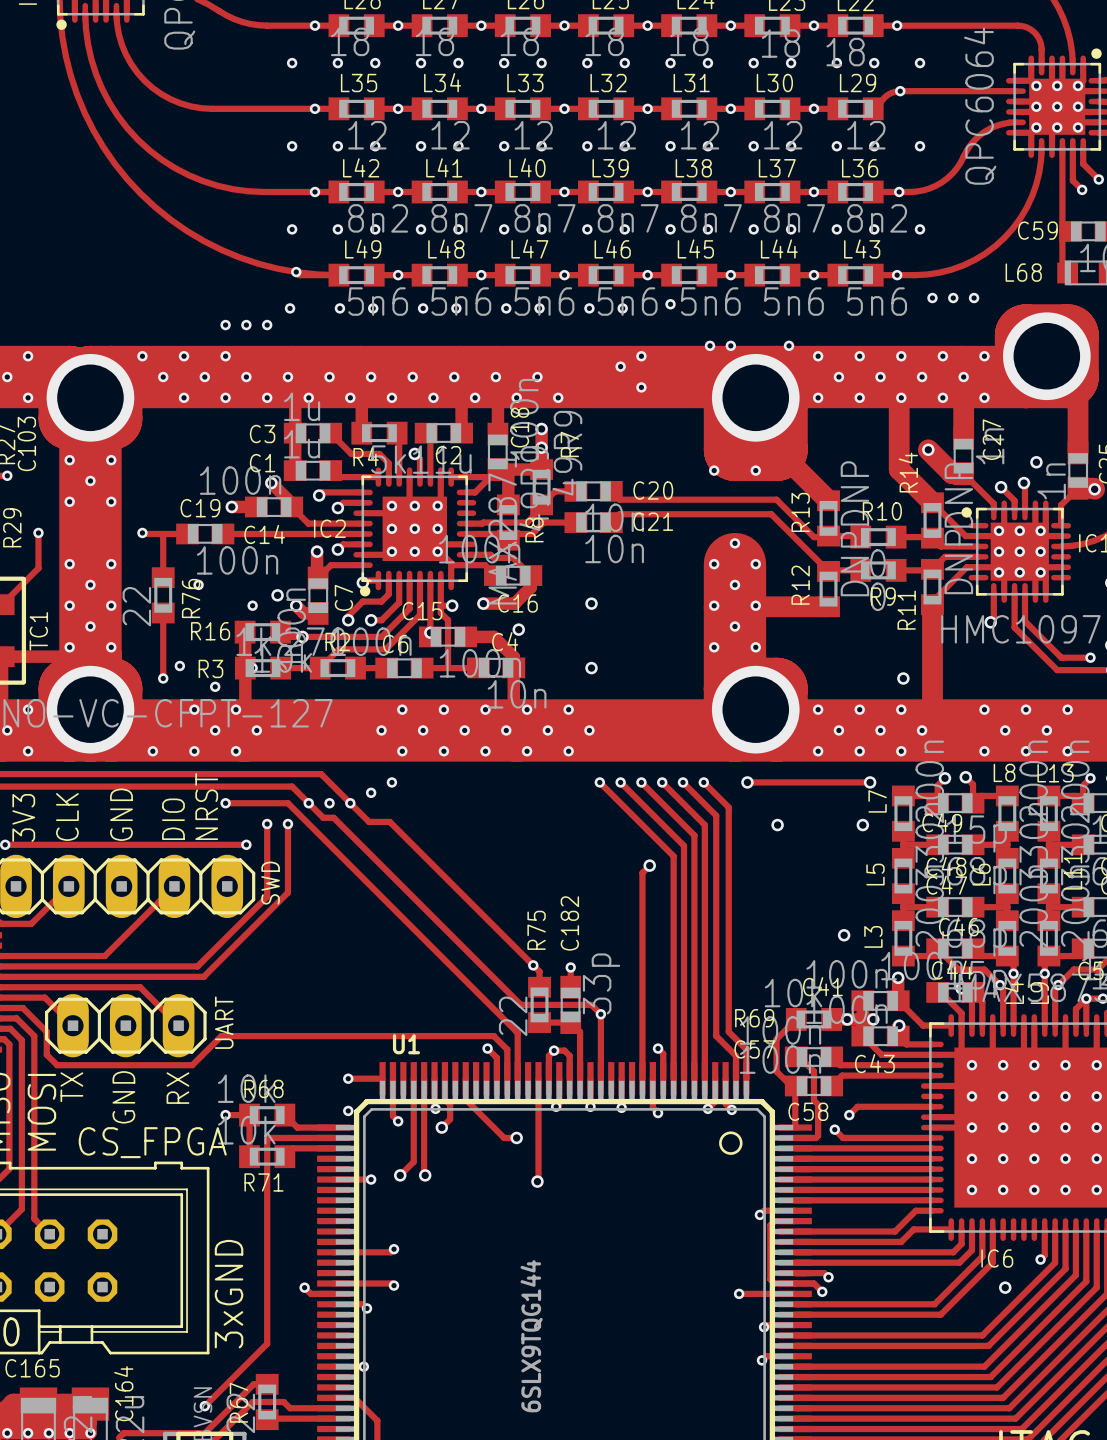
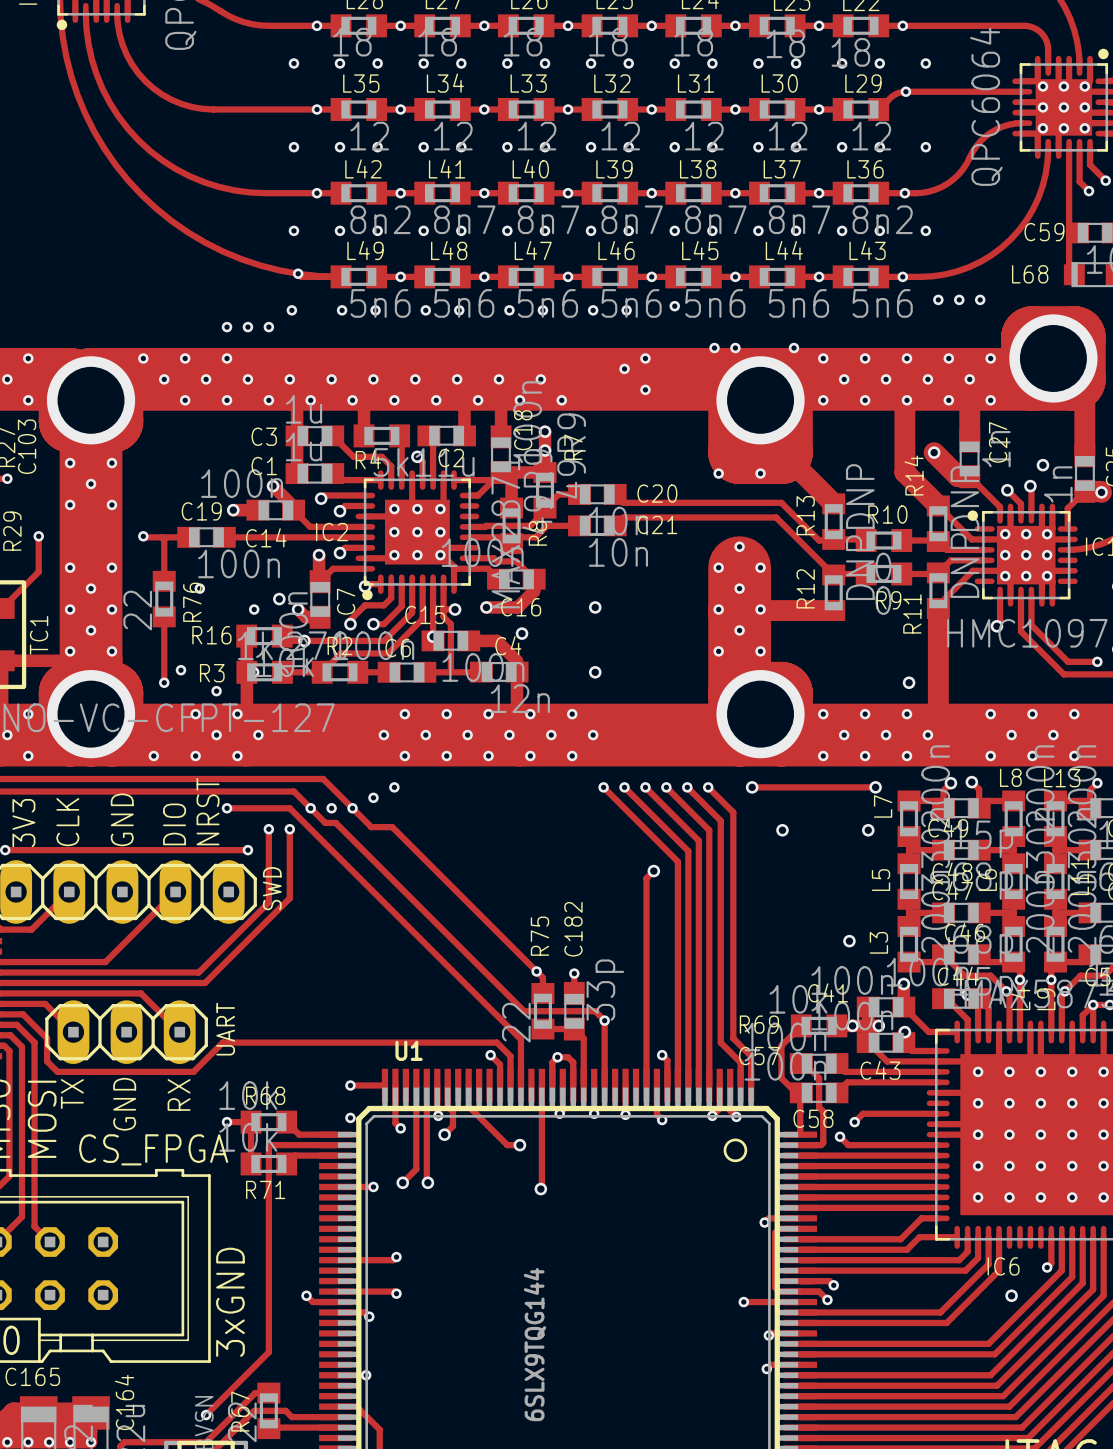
C4 value: 10n (517, 694) -> 12n (520, 698)

